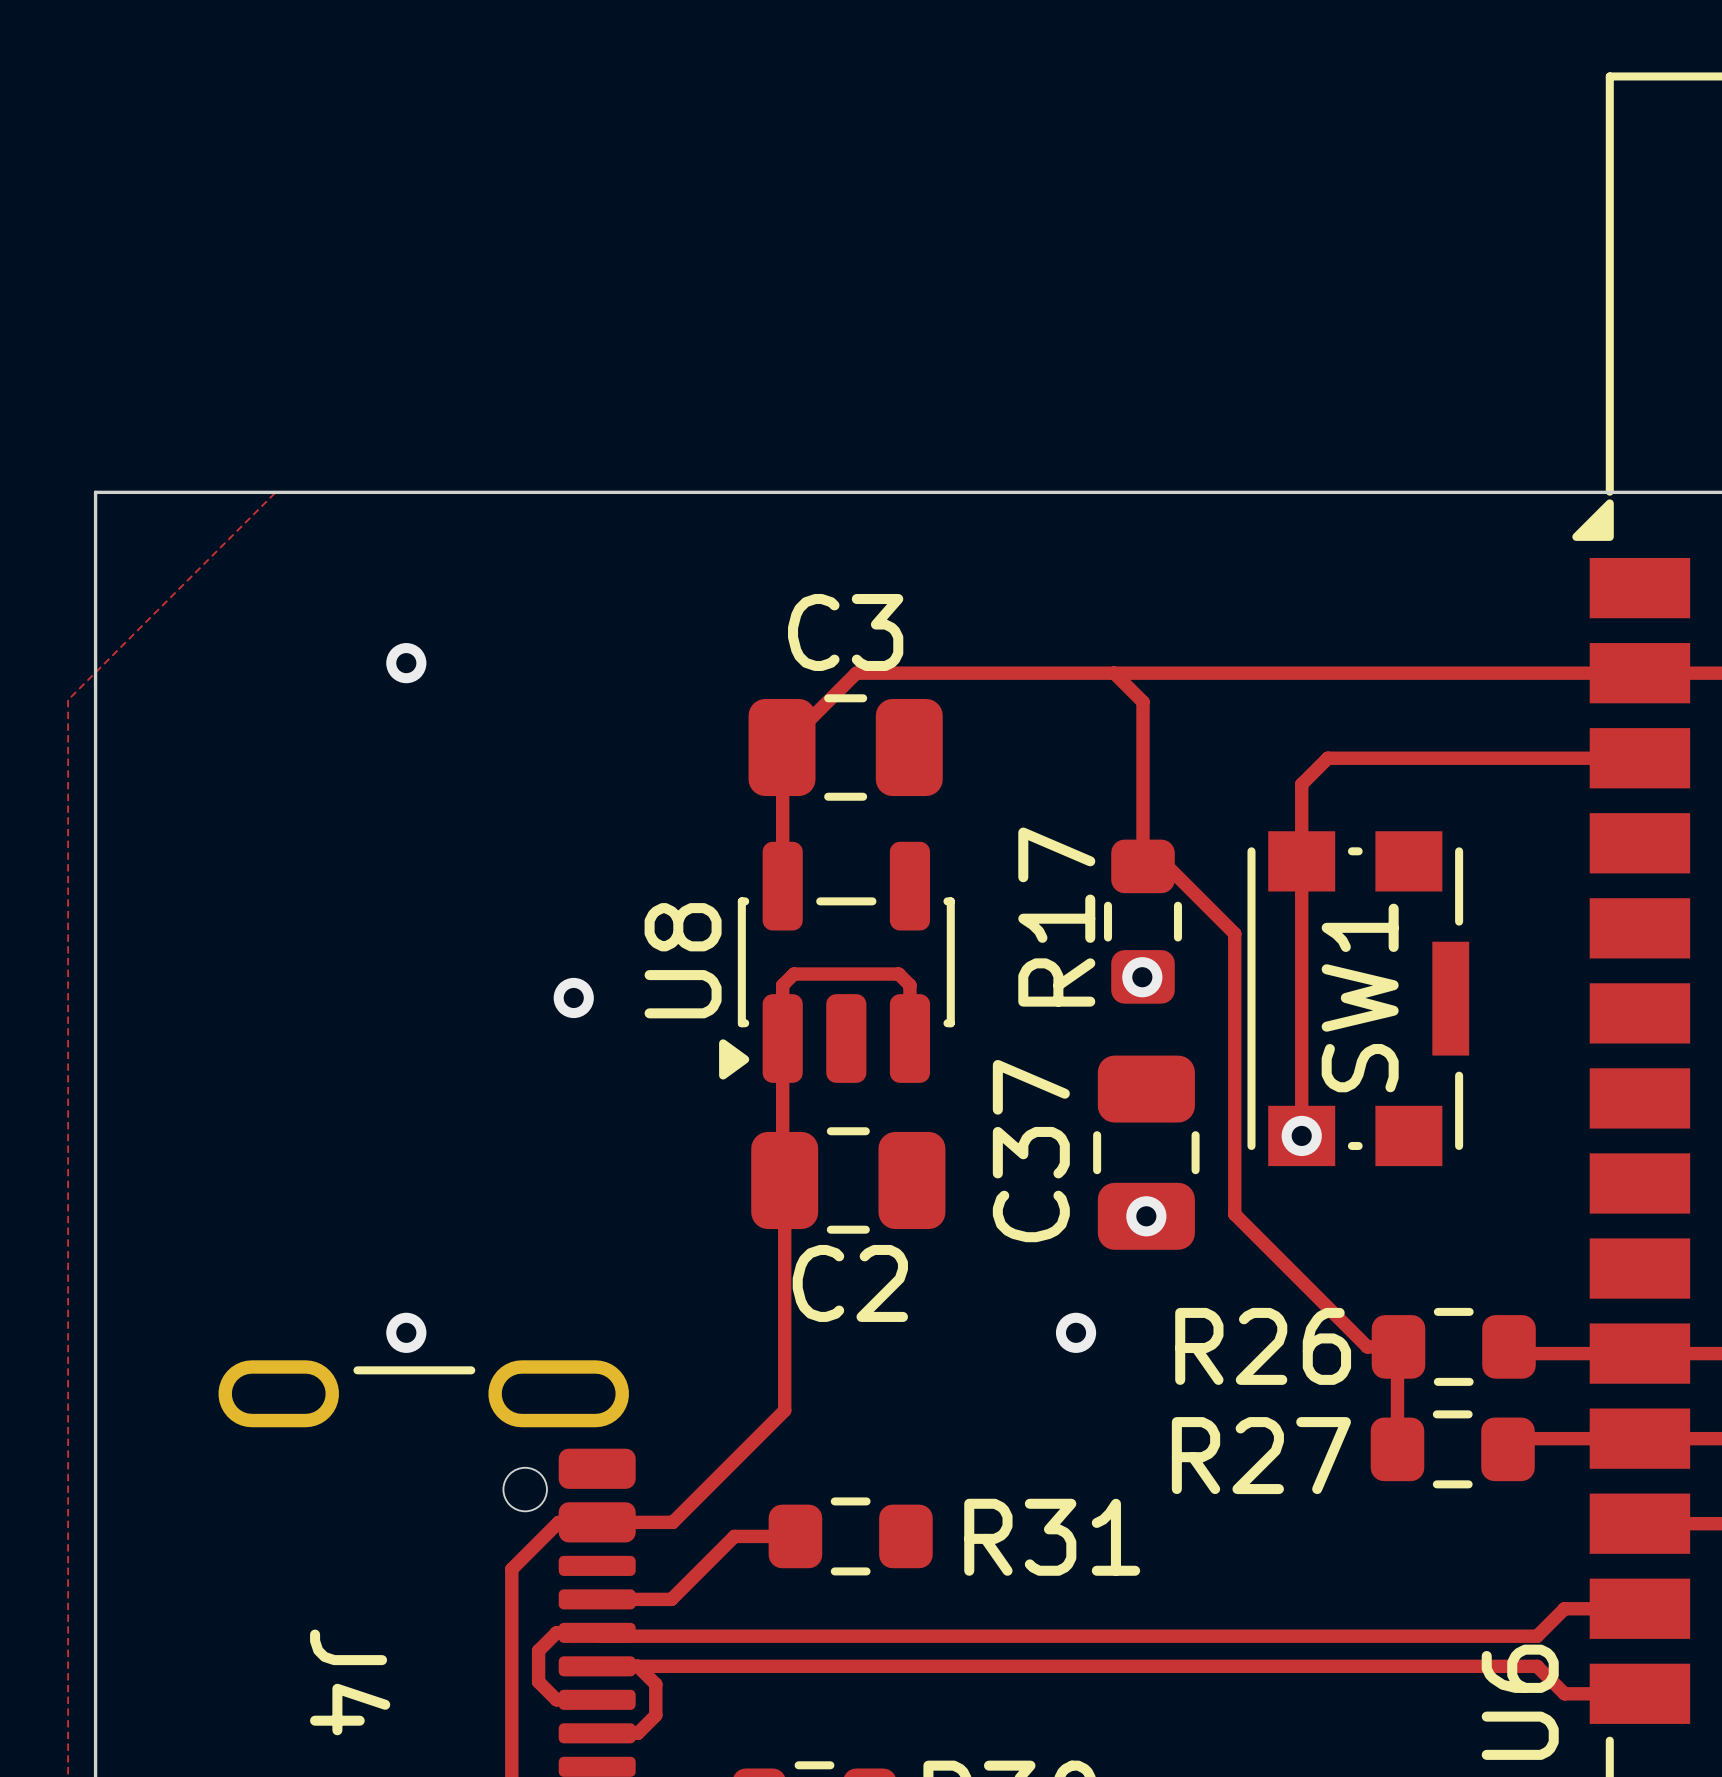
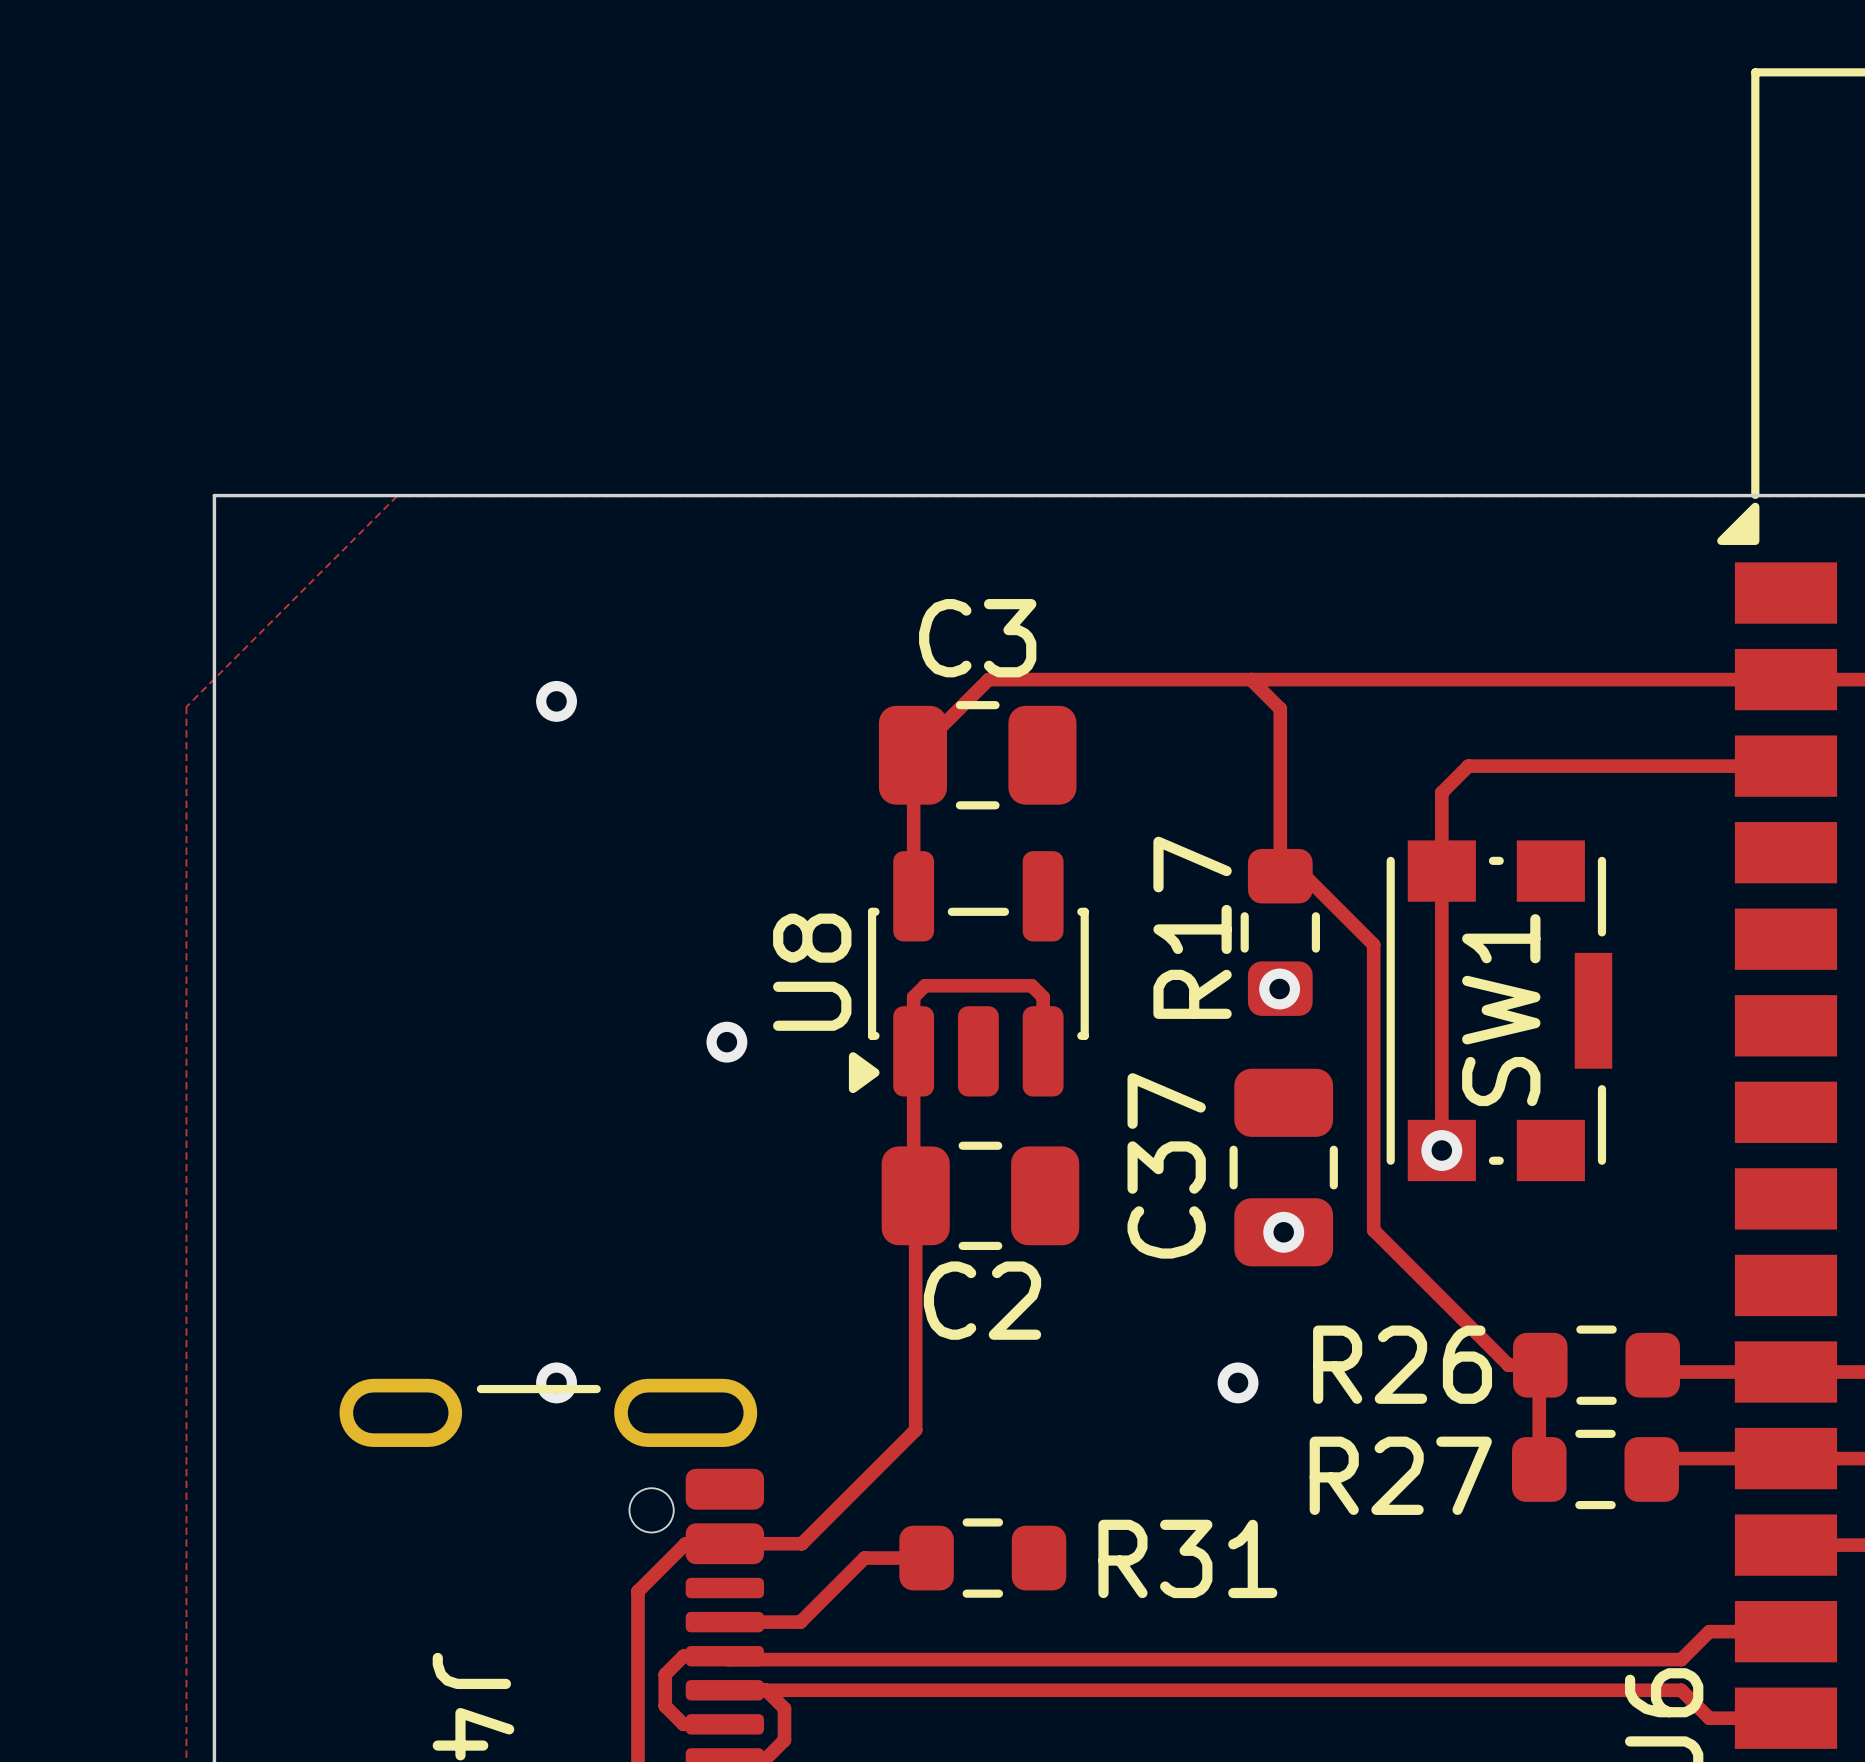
via position: (406, 663) -> (556, 701)
via position: (573, 997) -> (726, 1042)
via position: (406, 1332) -> (556, 1382)
via position: (1076, 1332) -> (1238, 1382)

